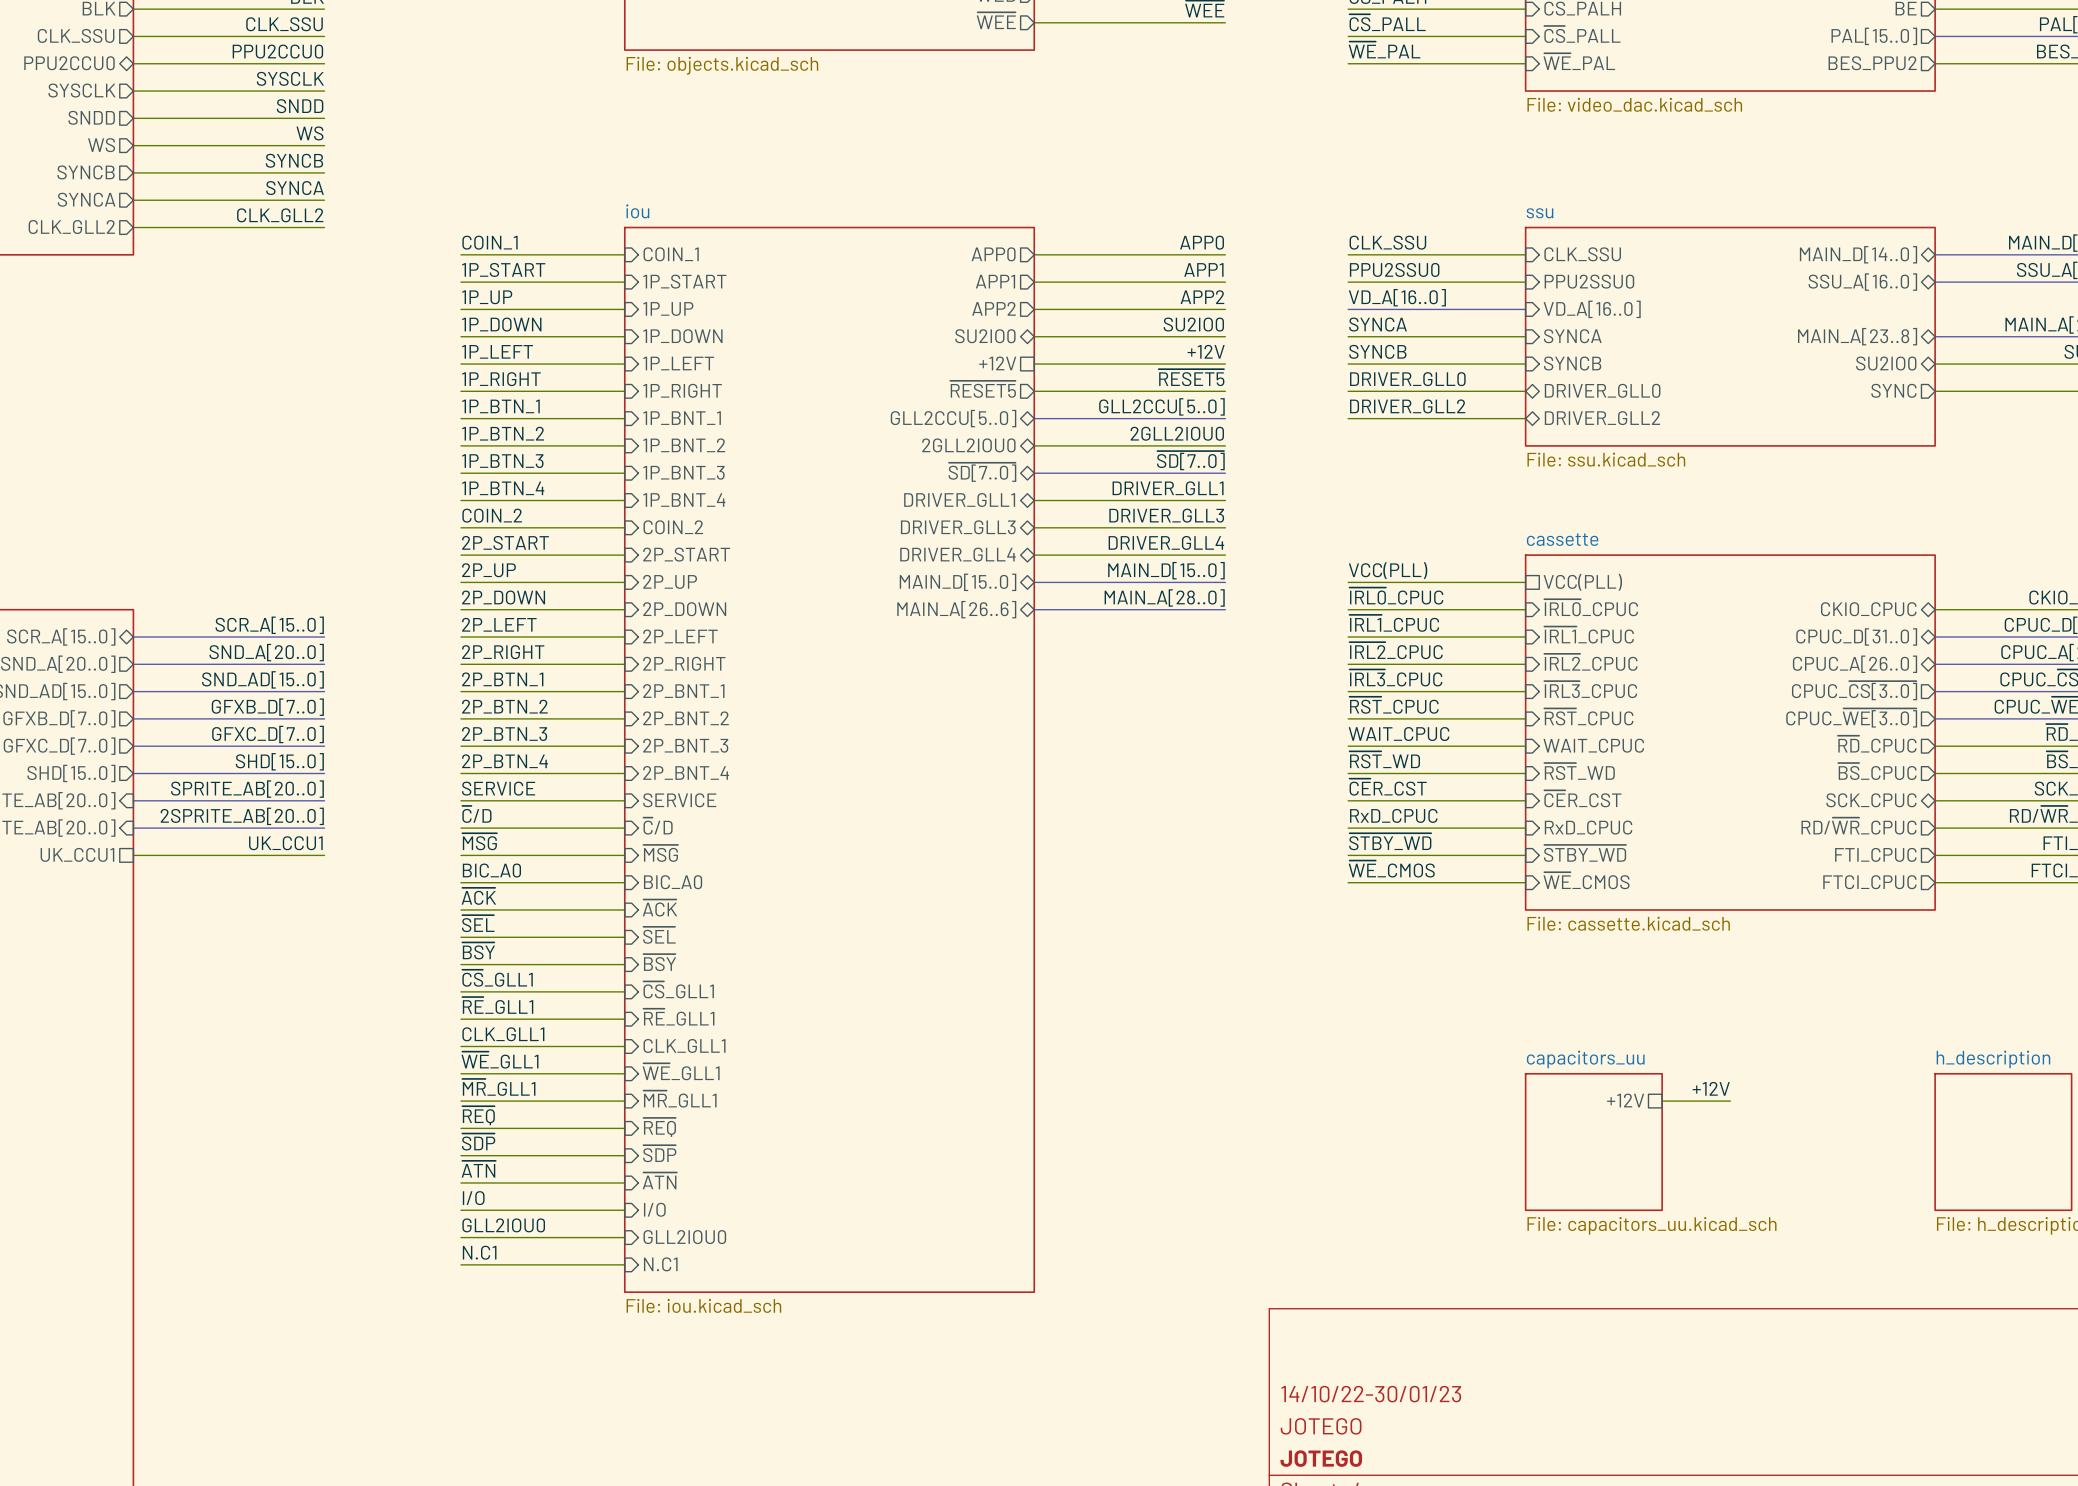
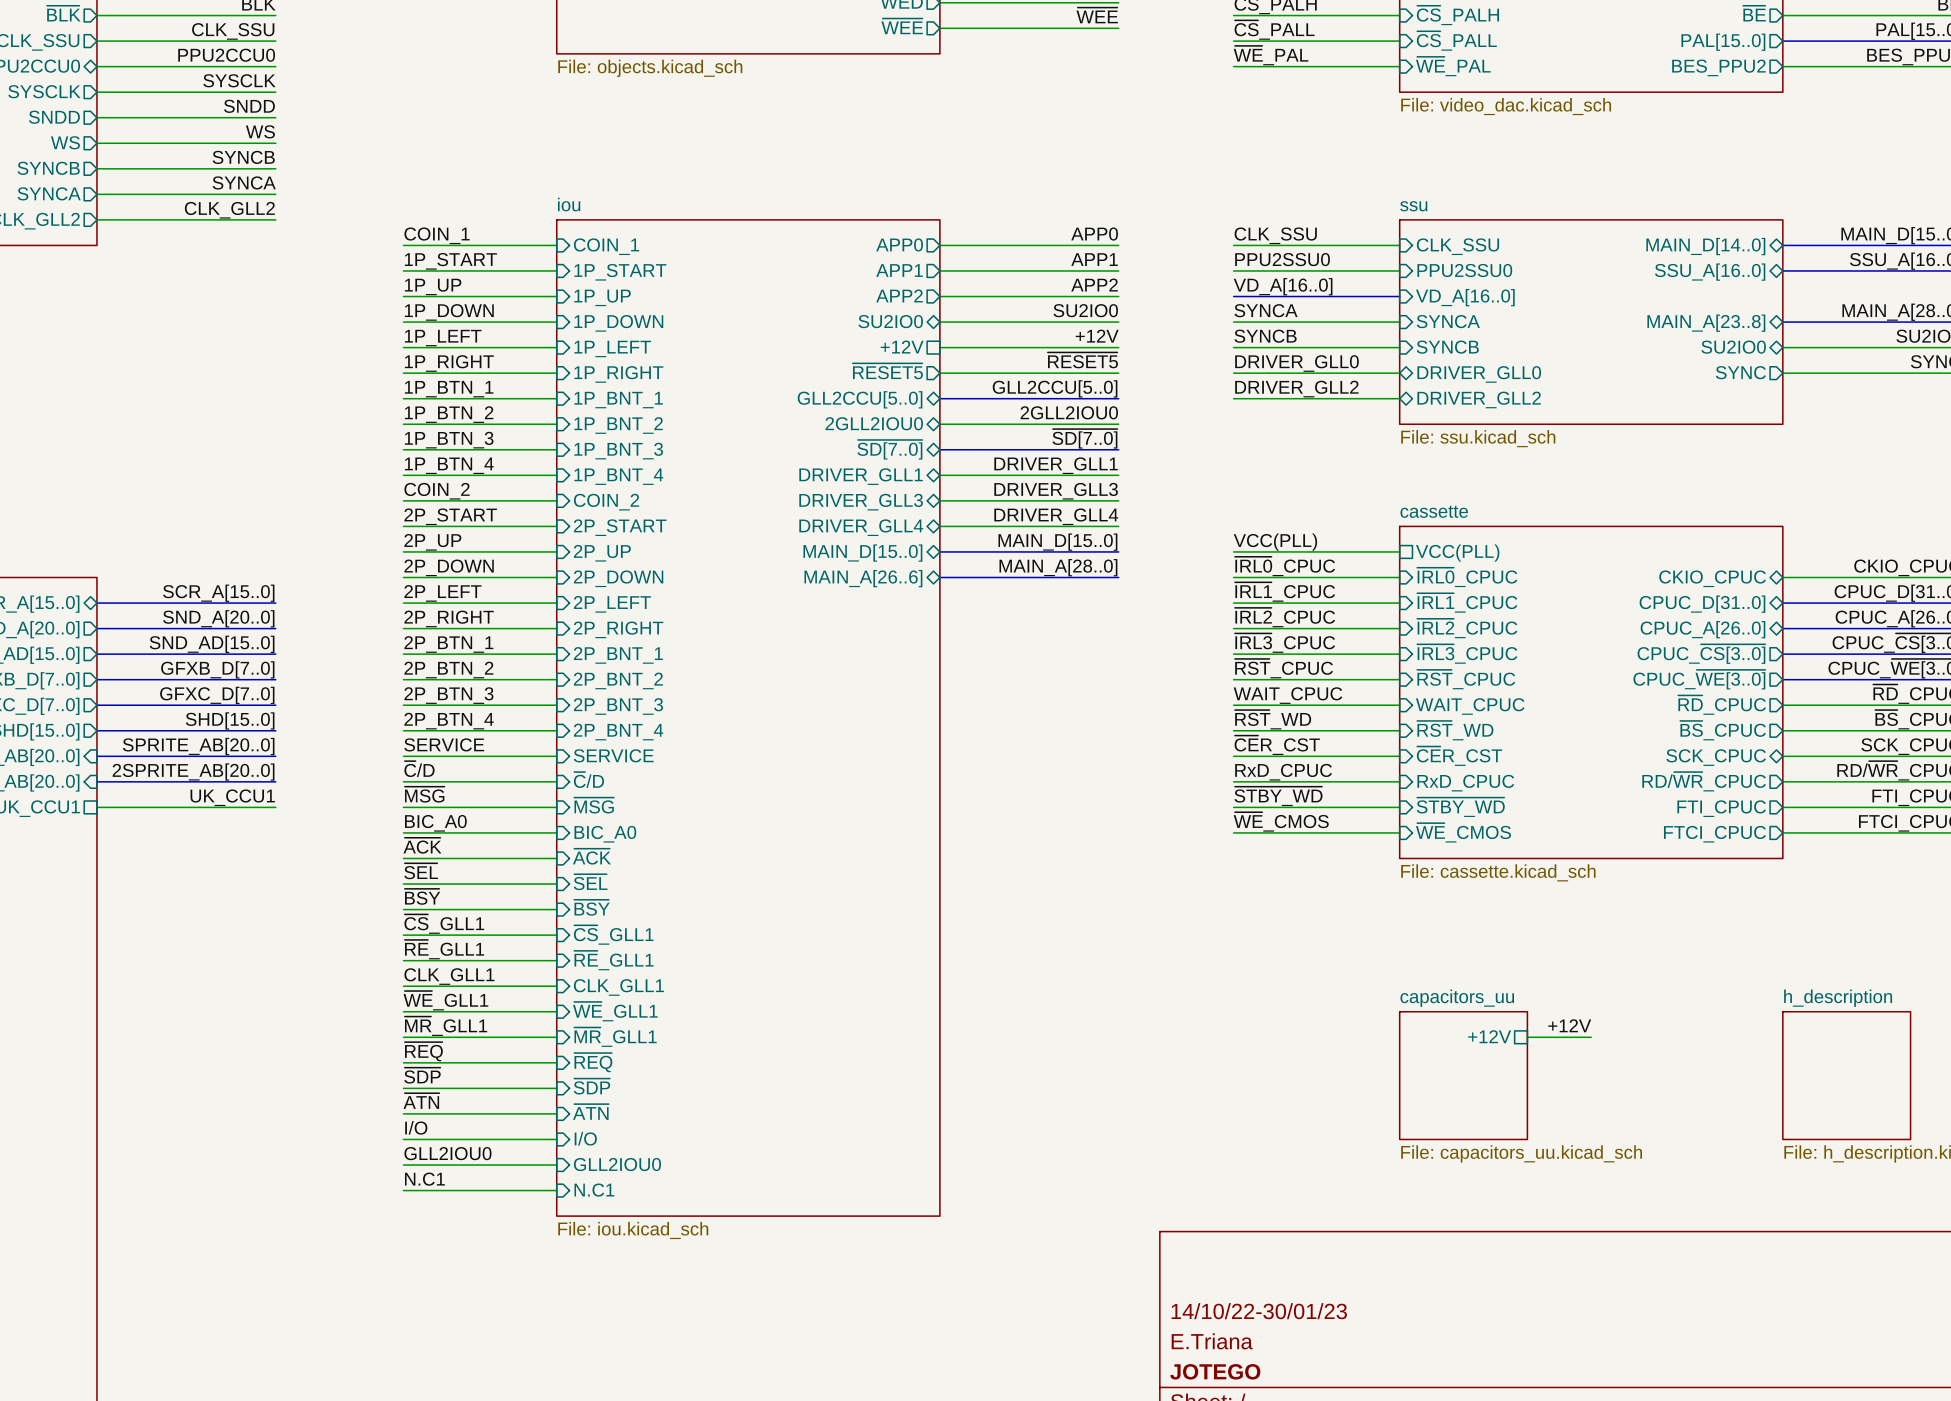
title block: JOTEGO (1321, 1426) -> E.Triana (1212, 1341)

